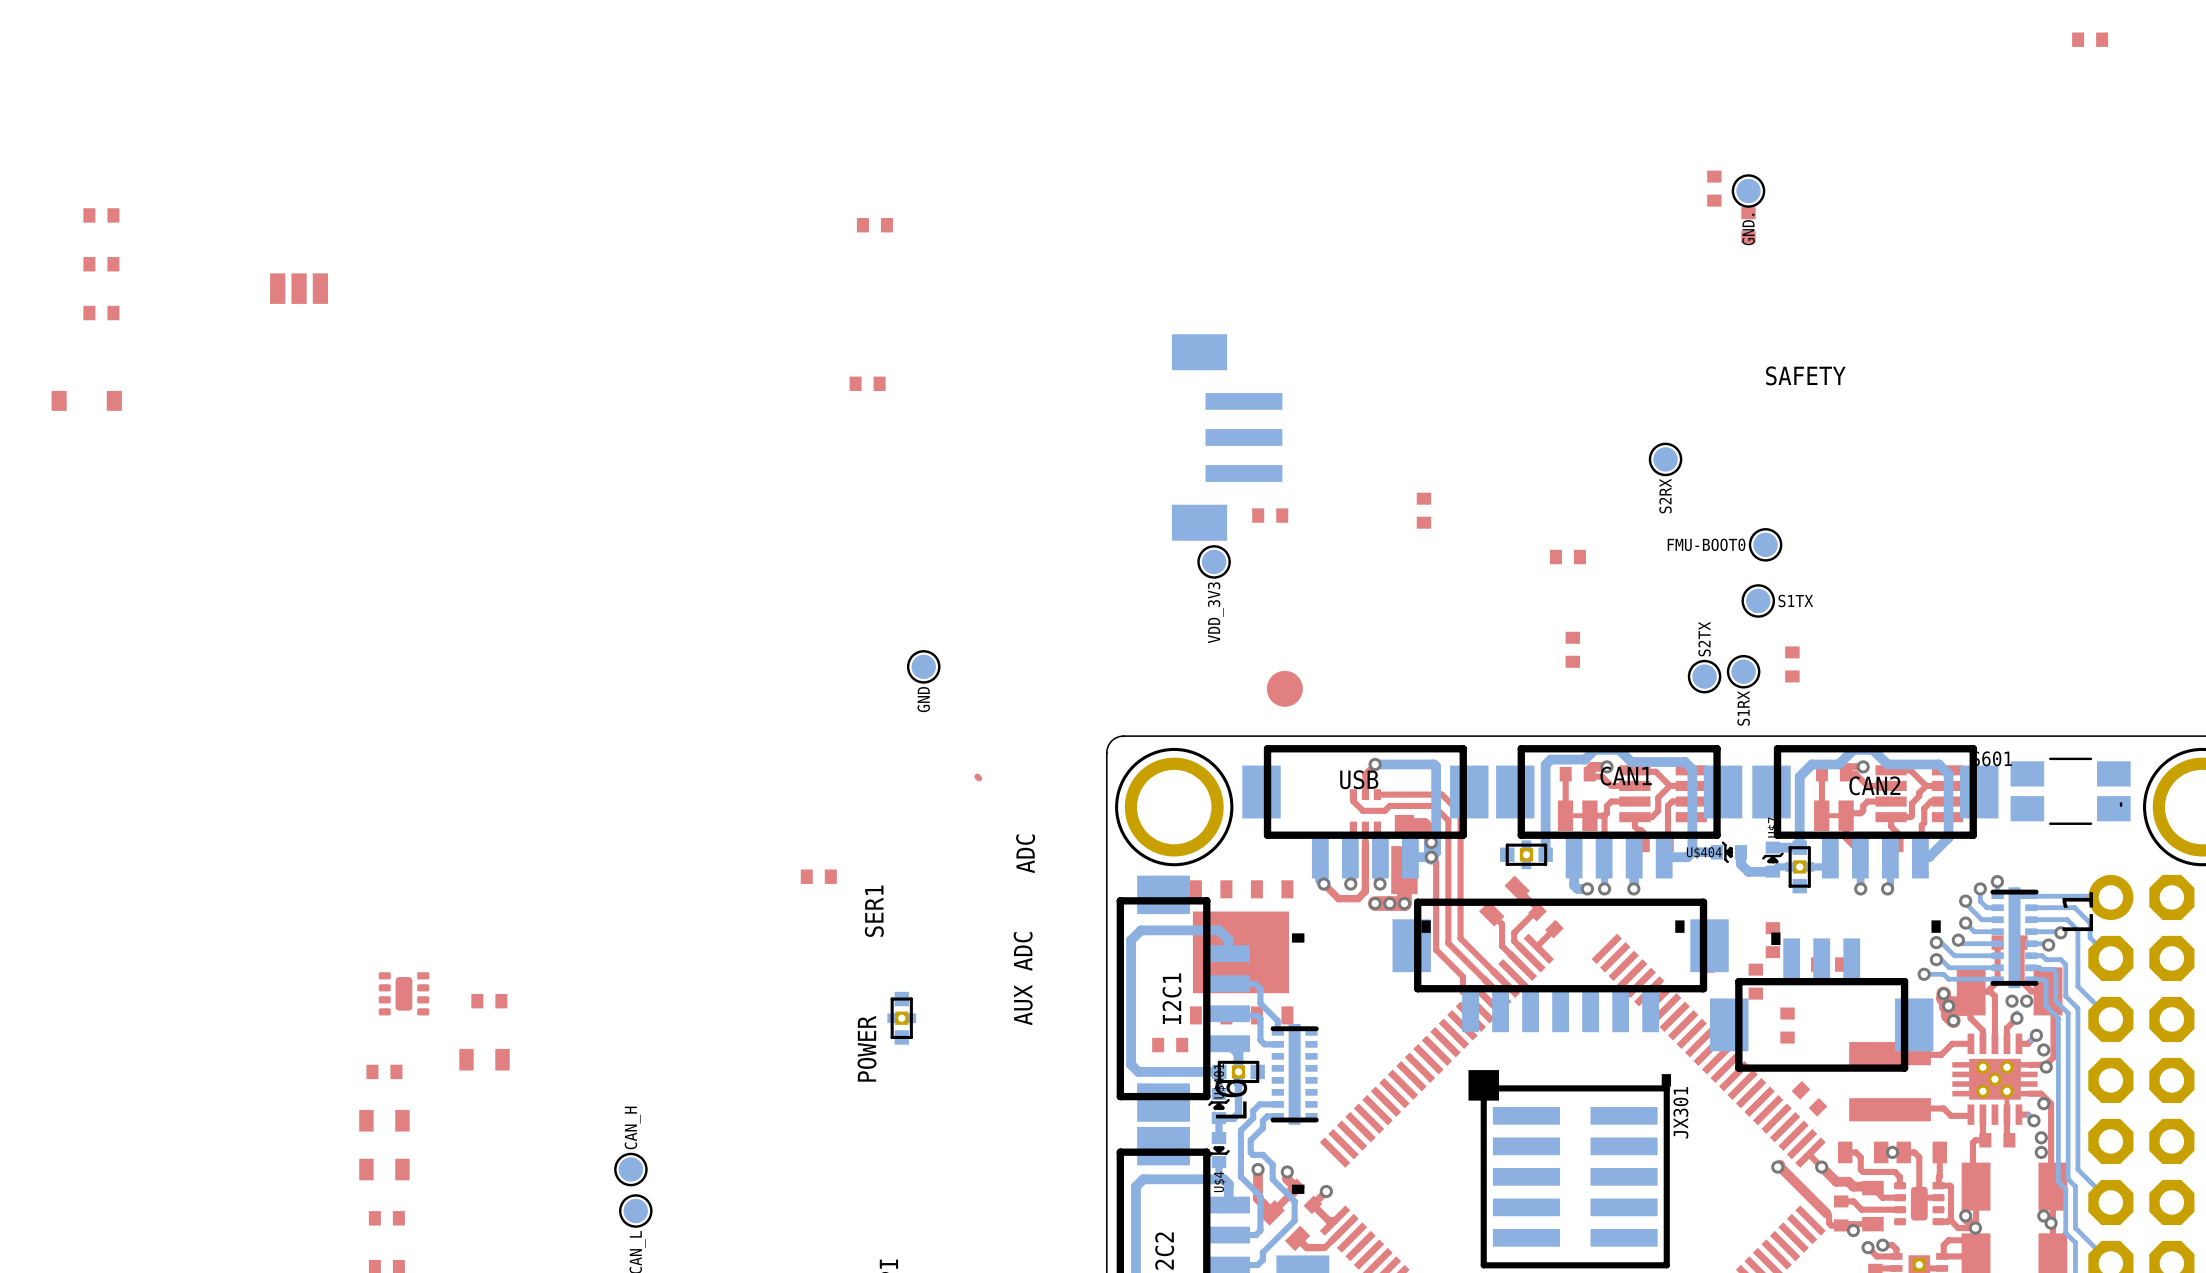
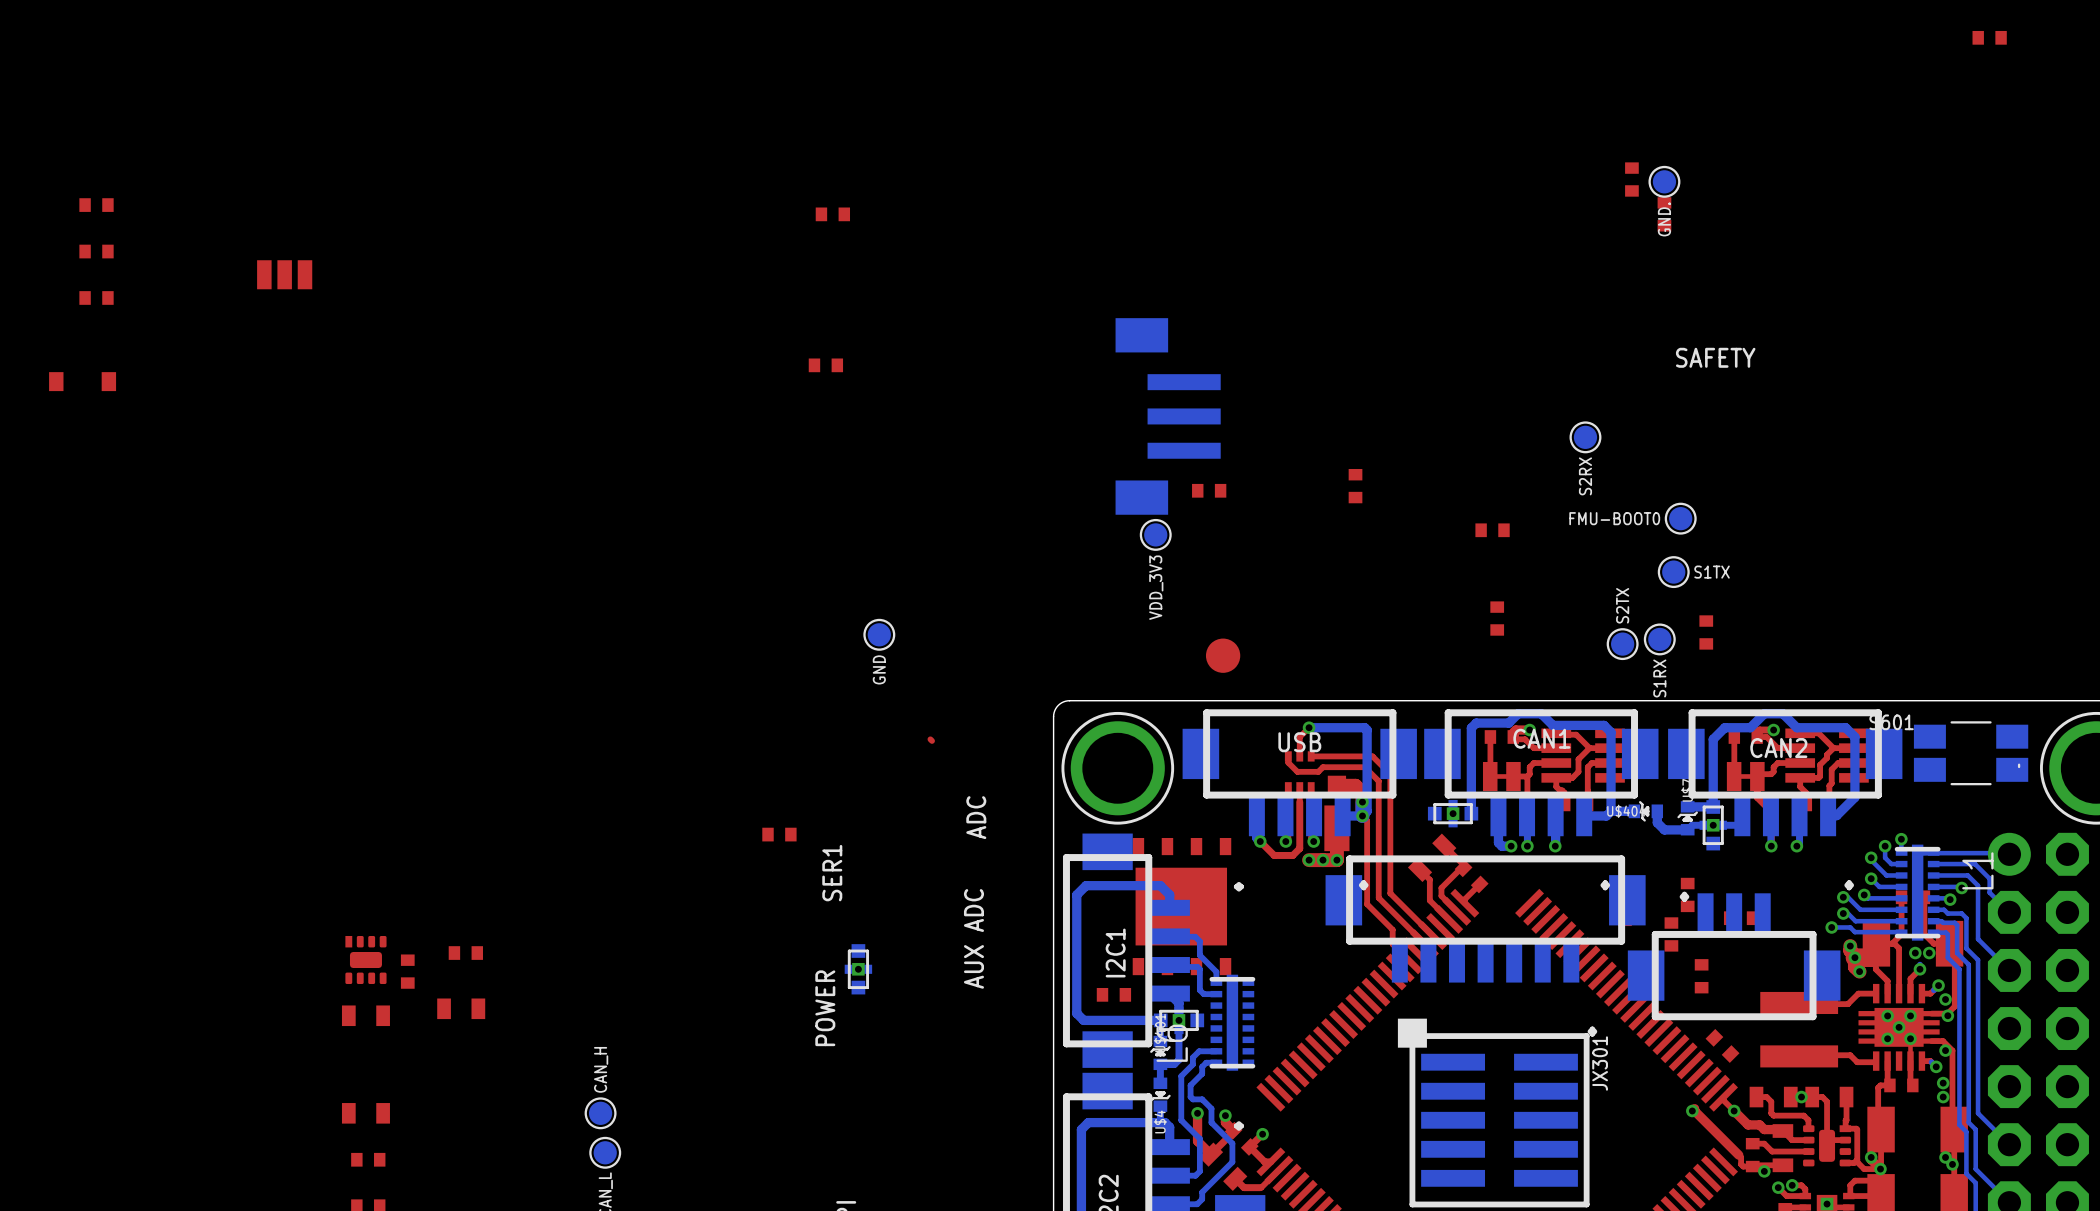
part rotation: 0° (403, 993) -> 90° counterclockwise (365, 960)
part: none -> (407, 971)
part footprint: [366, 1064, 403, 1080] -> [341, 1005, 390, 1027]
part: (384, 1120) -> none

